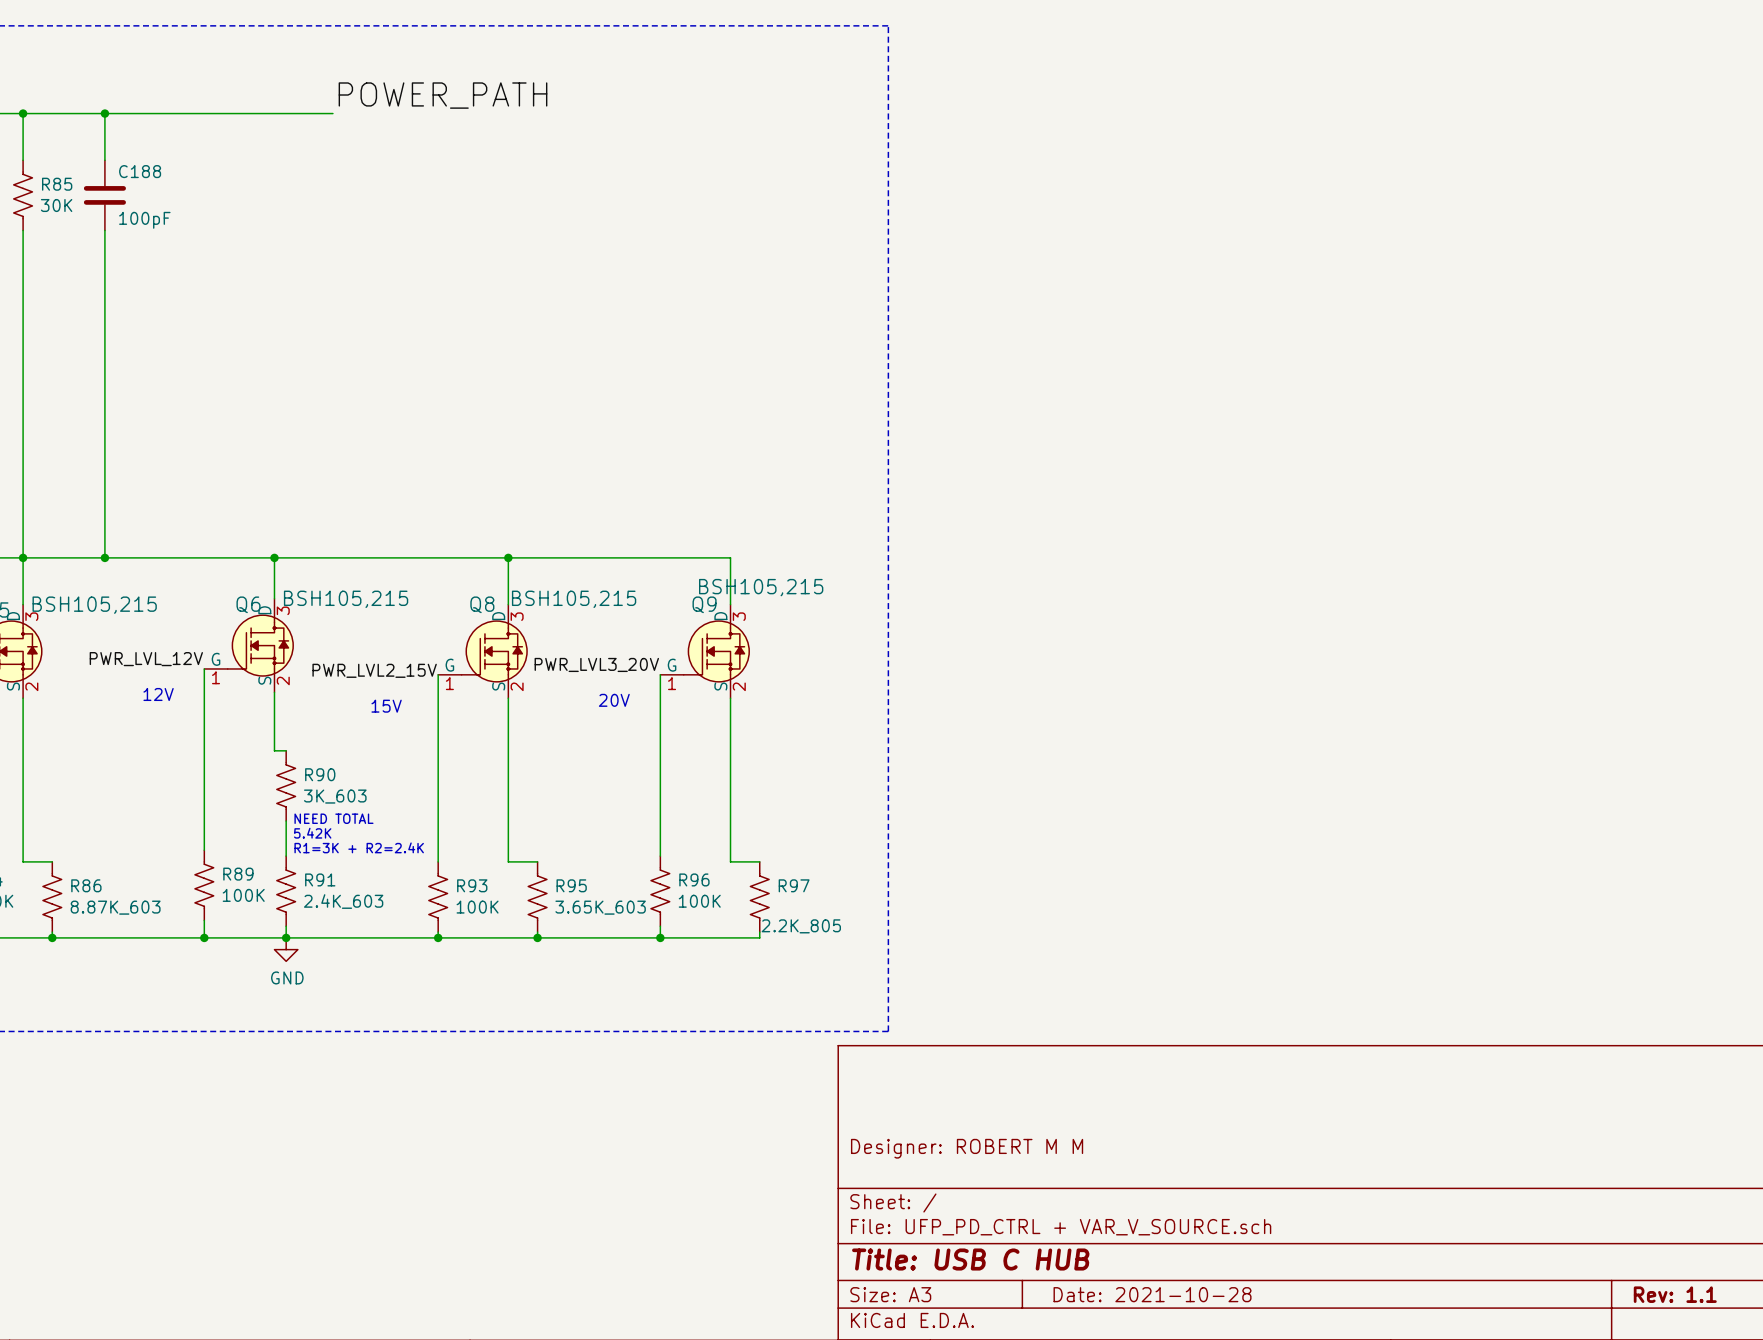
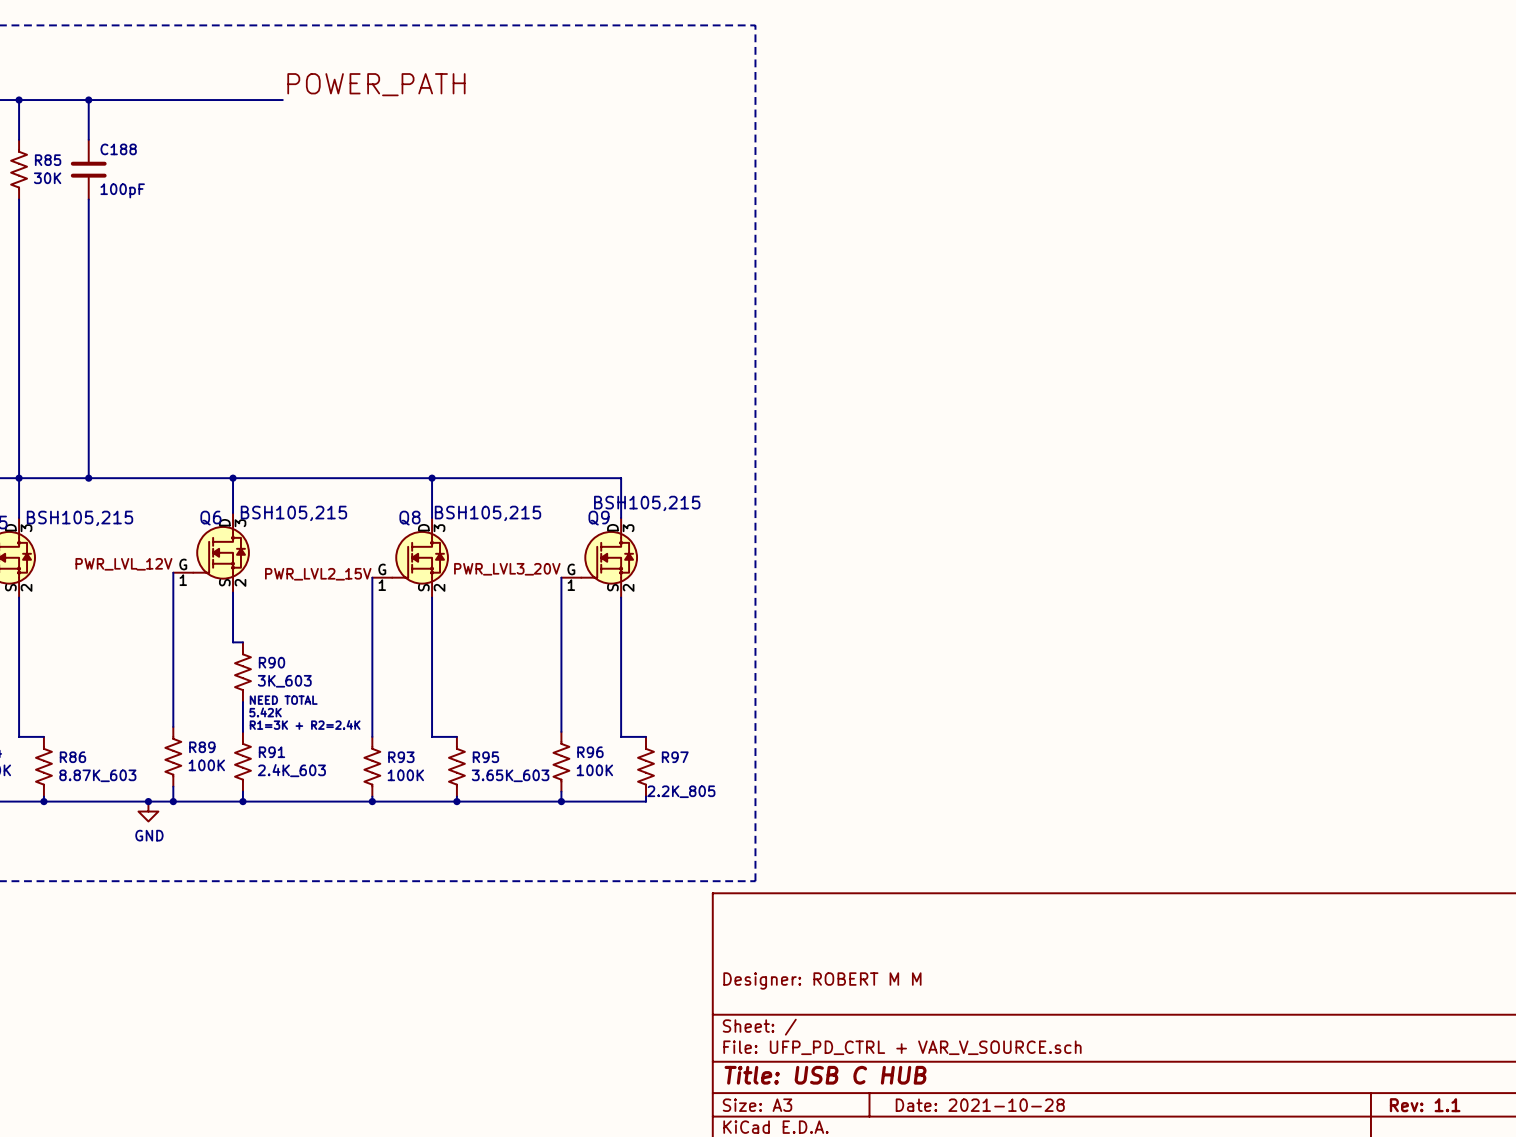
text: 12V (158, 694) -> none
text: 20V (614, 700) -> none
text: 15V (386, 706) -> none
junction: none -> (148, 801)
power symbol position: GND (286, 949) -> GND (148, 811)

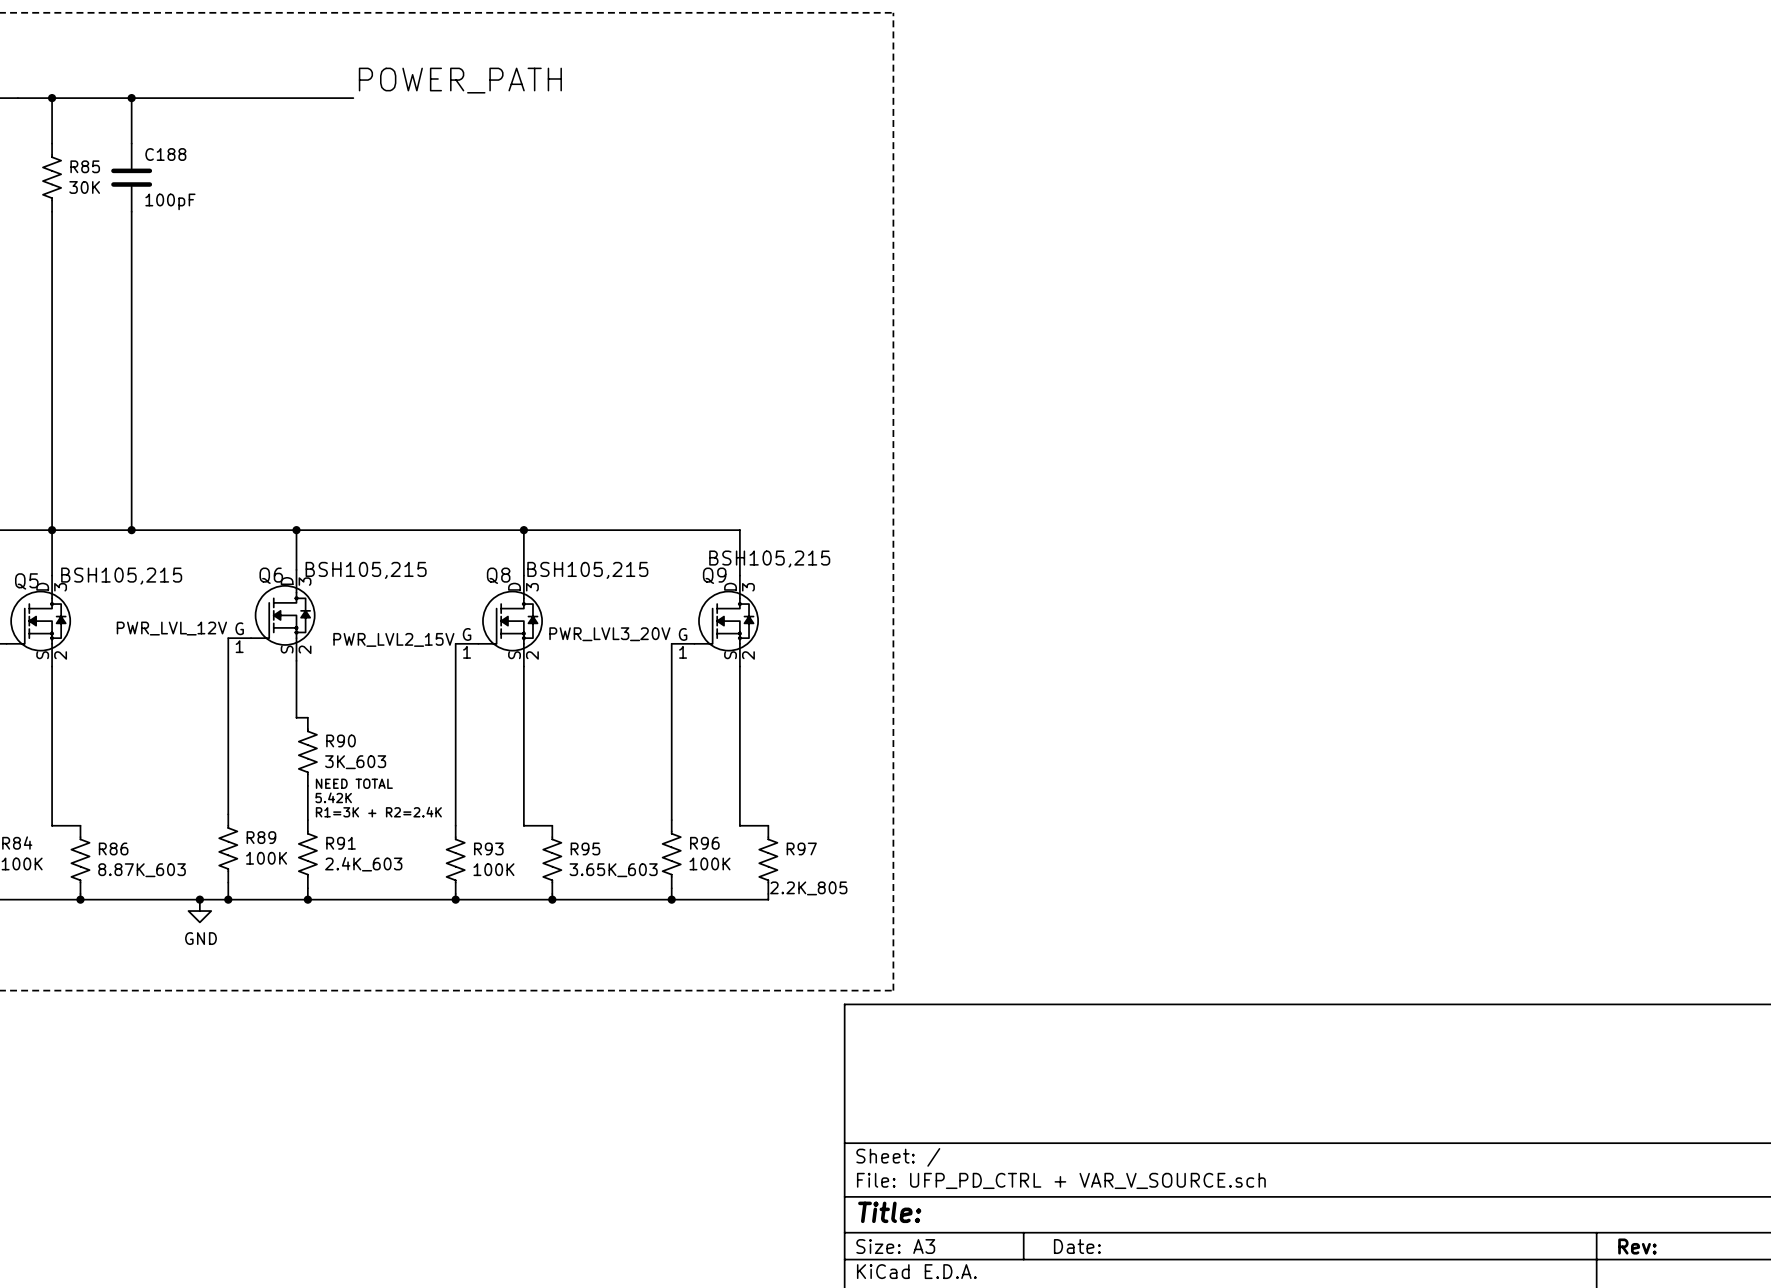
title block: Designer: ROBERT M M (822, 980) -> none
title block: Title: USB C HUB (825, 1075) -> Title: (889, 1212)
title block: Date: 2021-10-28 (980, 1105) -> Date: (1077, 1246)
title block: Rev: 1.1 (1425, 1105) -> Rev: (1637, 1246)

